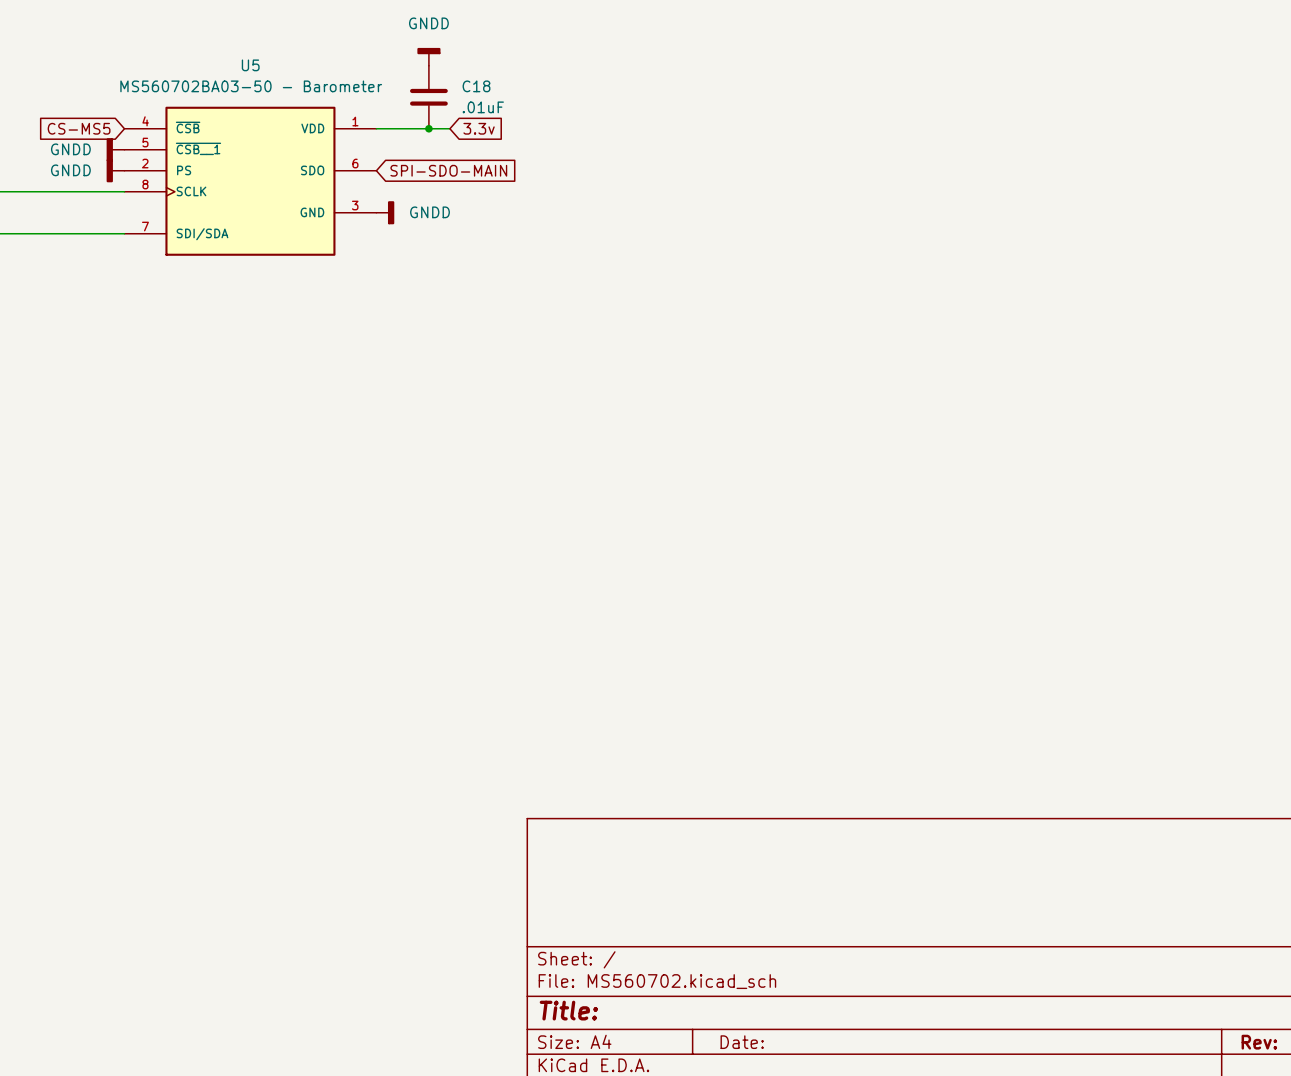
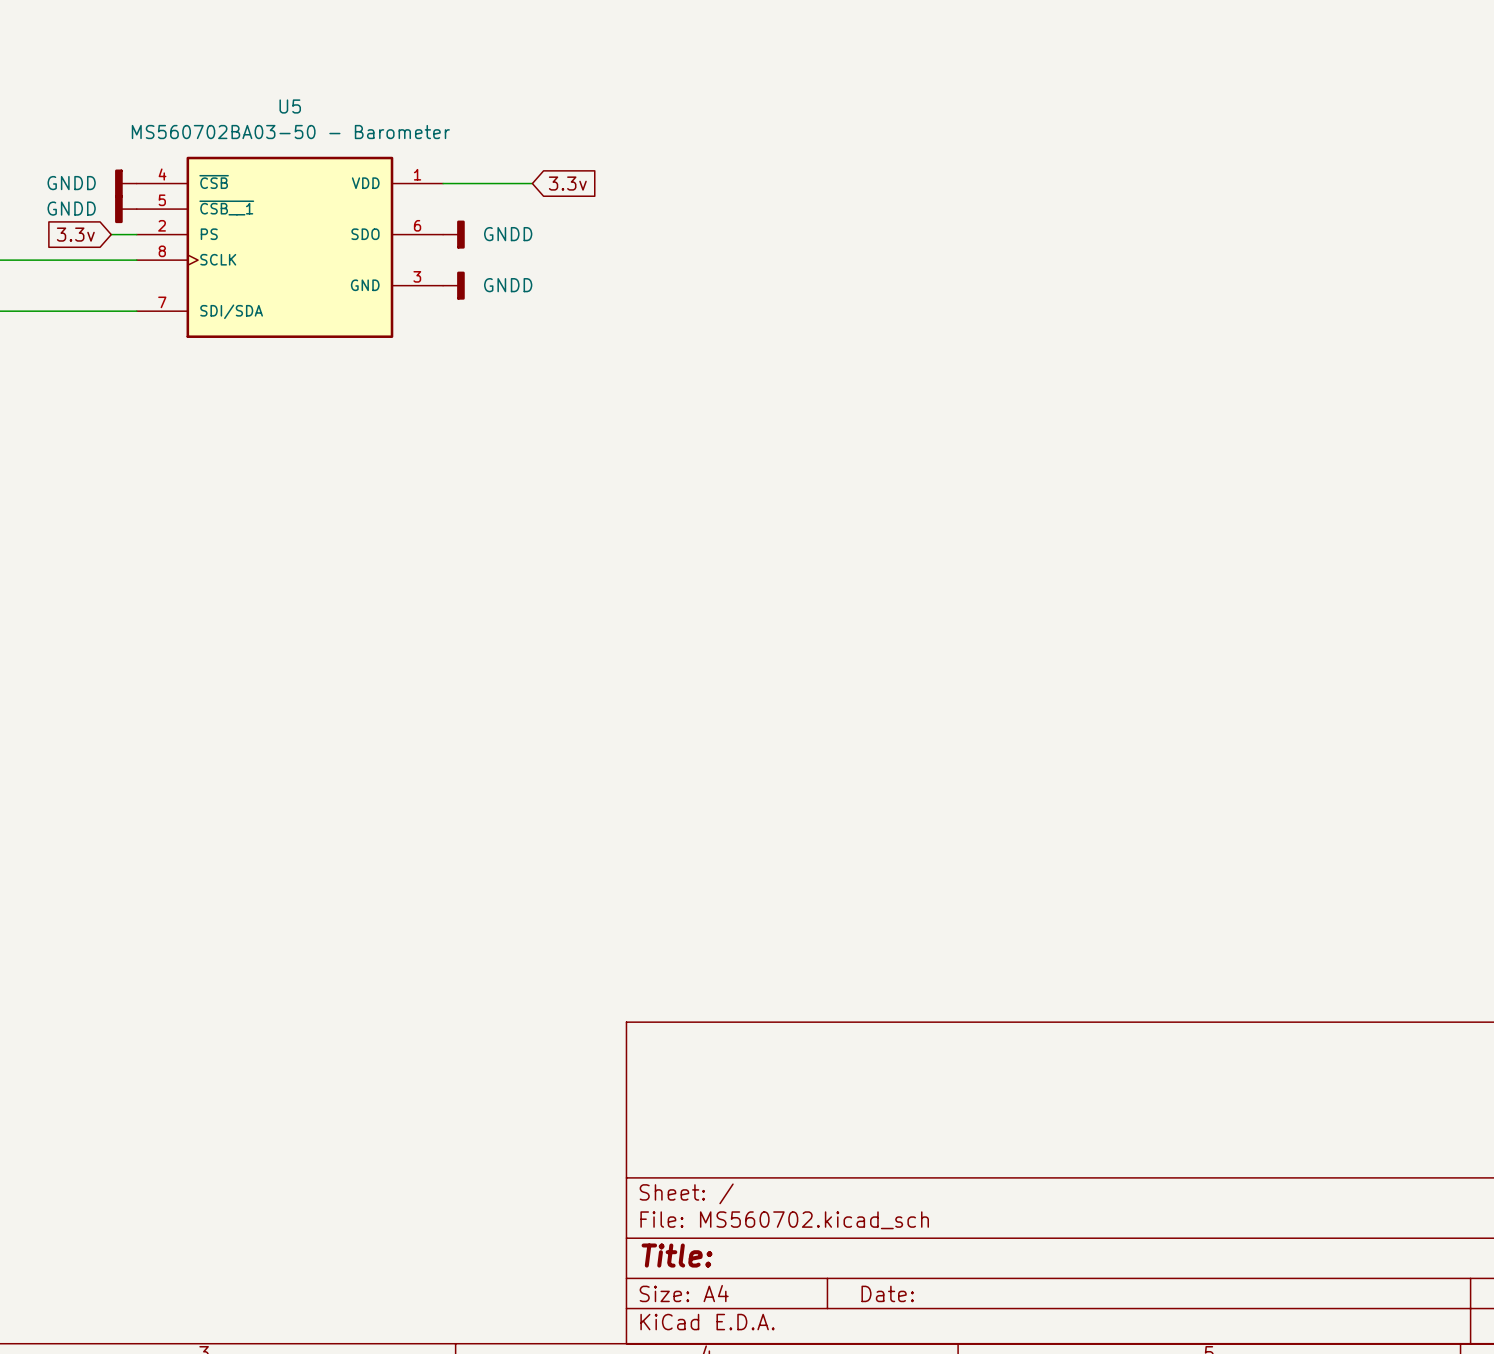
power symbol rotation: 0° (428, 56) -> 90° clockwise (453, 234)
power symbol position: GNDD (428, 56) -> GNDD (453, 234)
C18: .01uF (428, 97) -> none
global label: CS-MS5 (79, 128) -> none
junction: (428, 128) -> none
global label: none -> 3.3v (75, 234)
power symbol position: GNDD (115, 170) -> GNDD (125, 183)
global label: SPI-SDO-MAIN (448, 170) -> none

